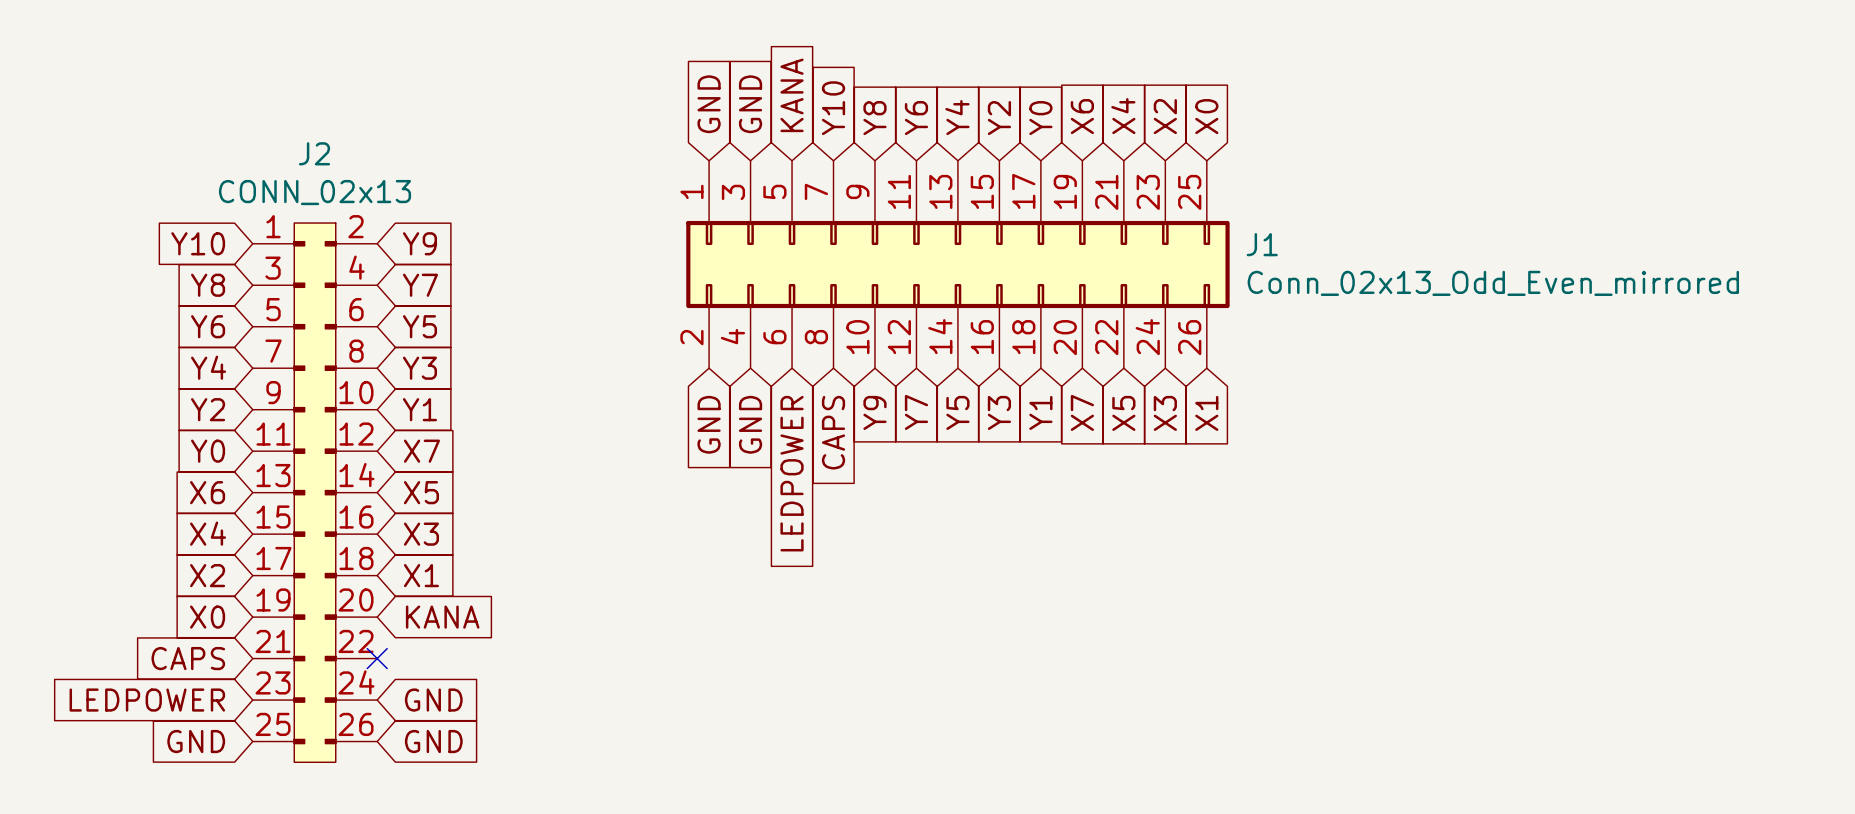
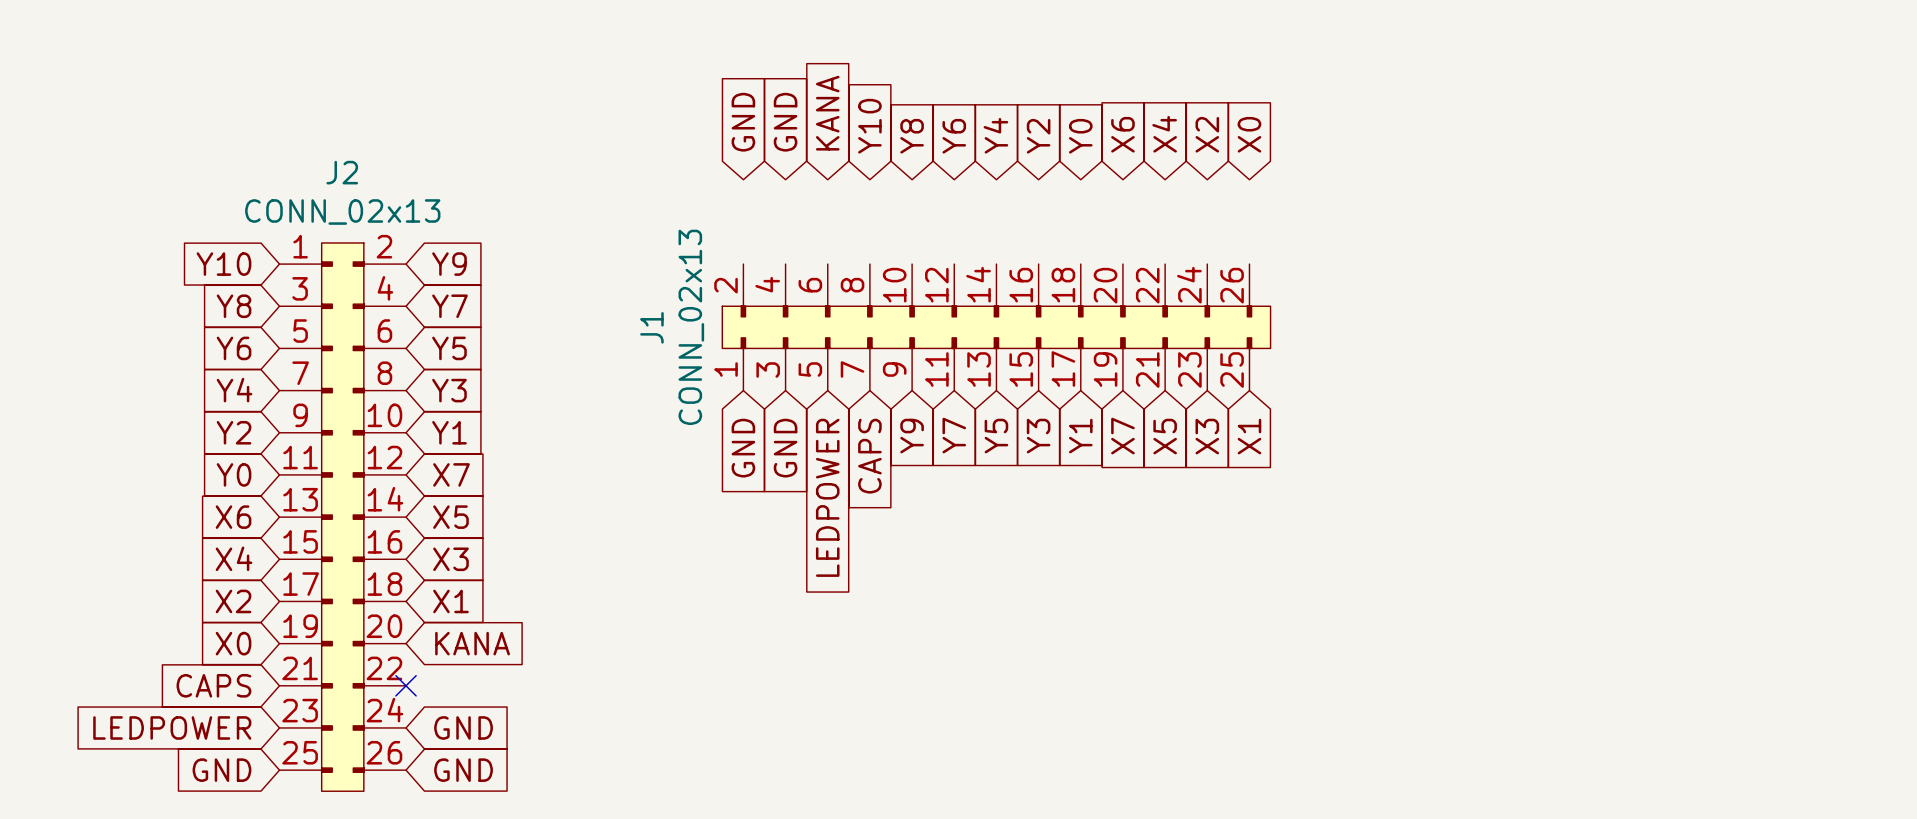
J1 symbol: [686, 160, 1230, 369] -> [722, 264, 1271, 391]
J1 name position: J1 (1262, 244) -> J1 (651, 327)
J1 value: Conn_02x13_Odd_Even_mirrored (1493, 283) -> CONN_02x13 (691, 327)

